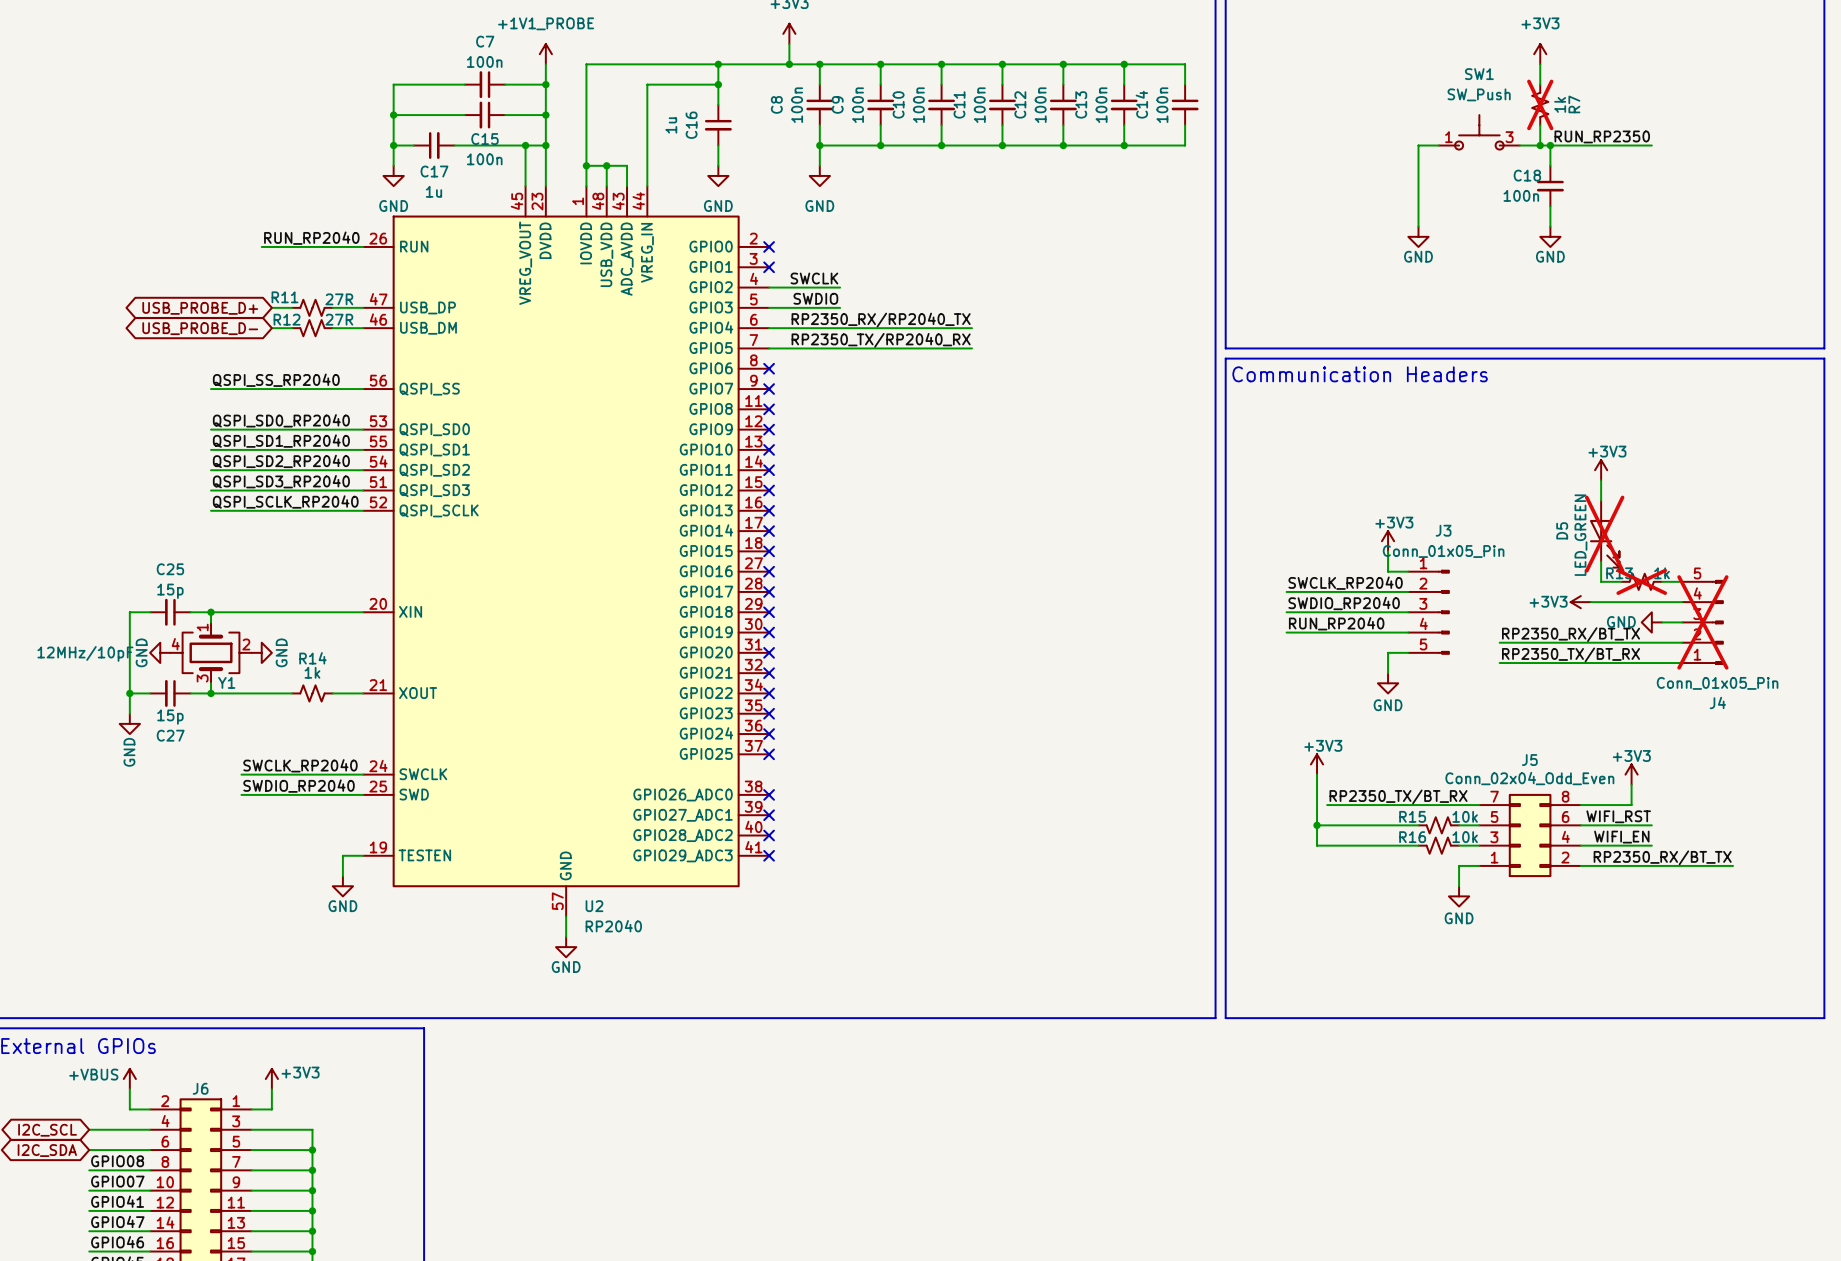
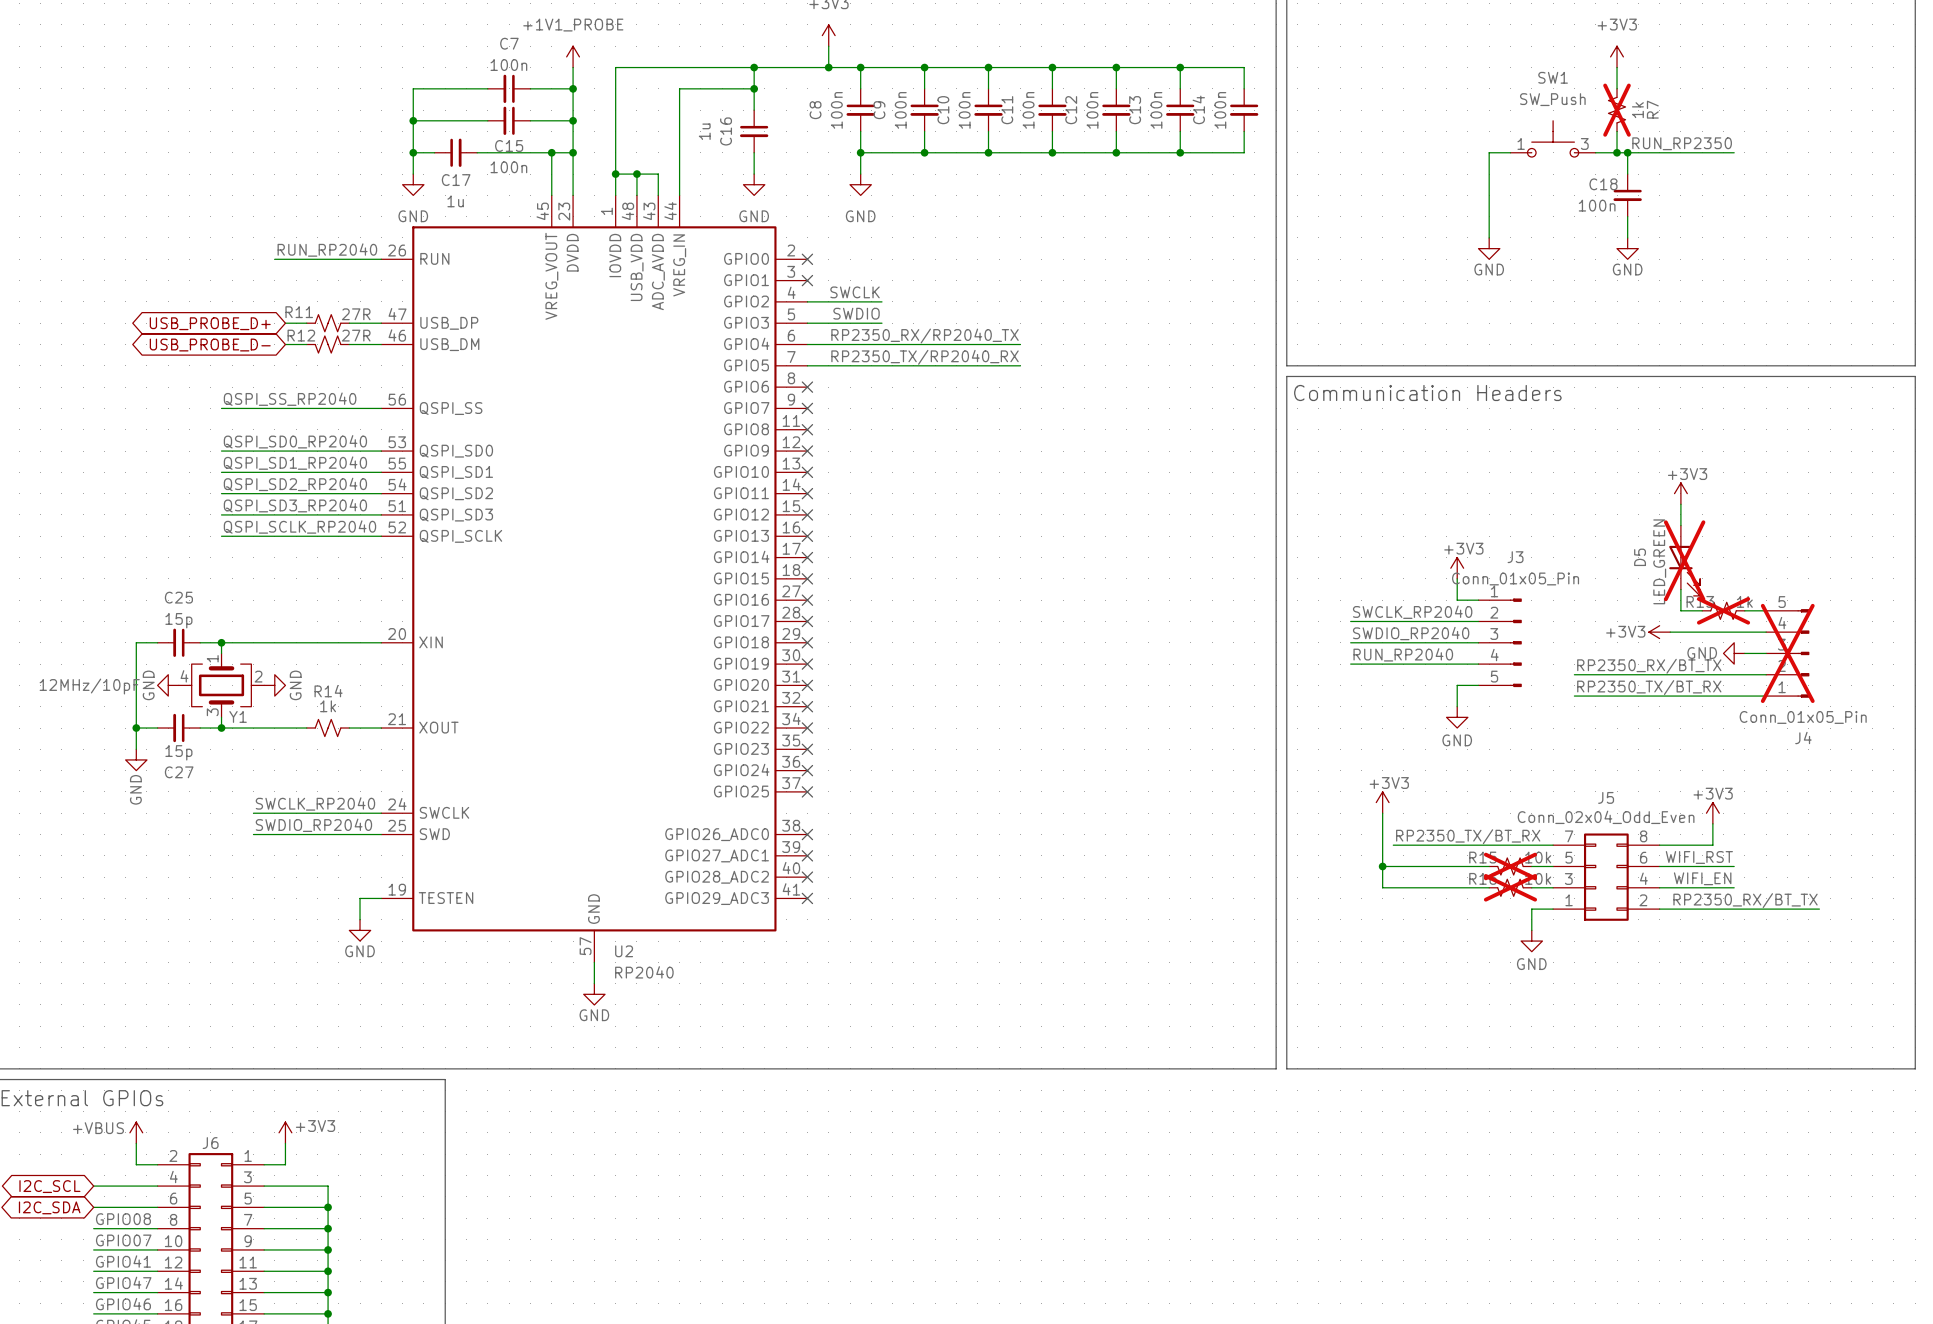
R15 do-not-place cross: none -> (1510, 866)
R16 do-not-place cross: none -> (1510, 887)

